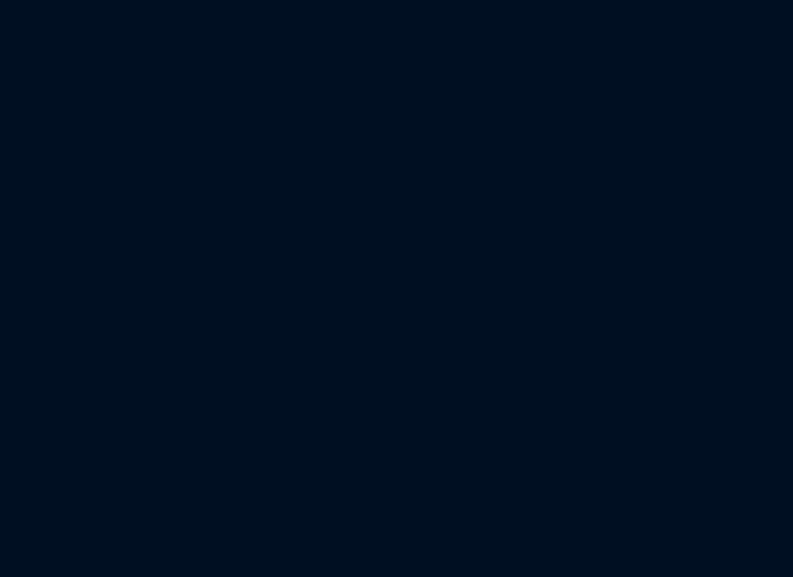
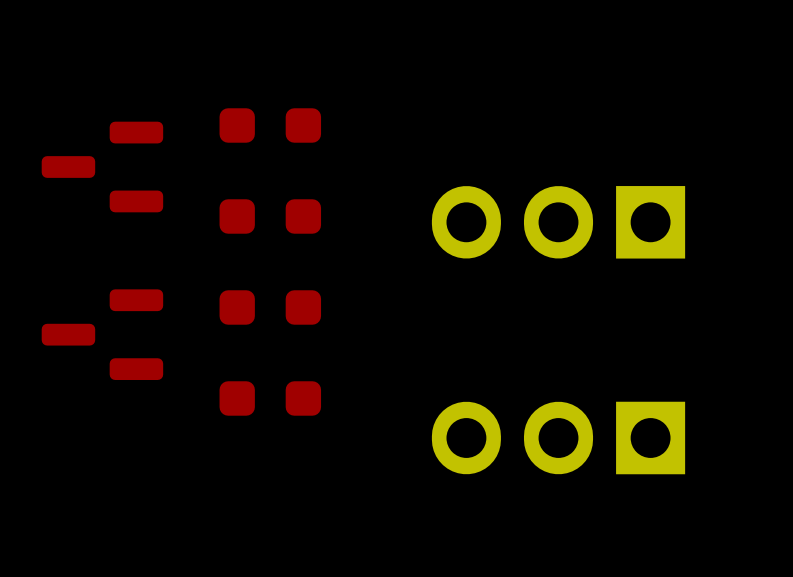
part: none -> (270, 125)
part: none -> (102, 167)
part: none -> (270, 216)
part: none -> (558, 222)
part: none -> (270, 307)
part: none -> (102, 334)
part: none -> (270, 398)
part: none -> (558, 438)

